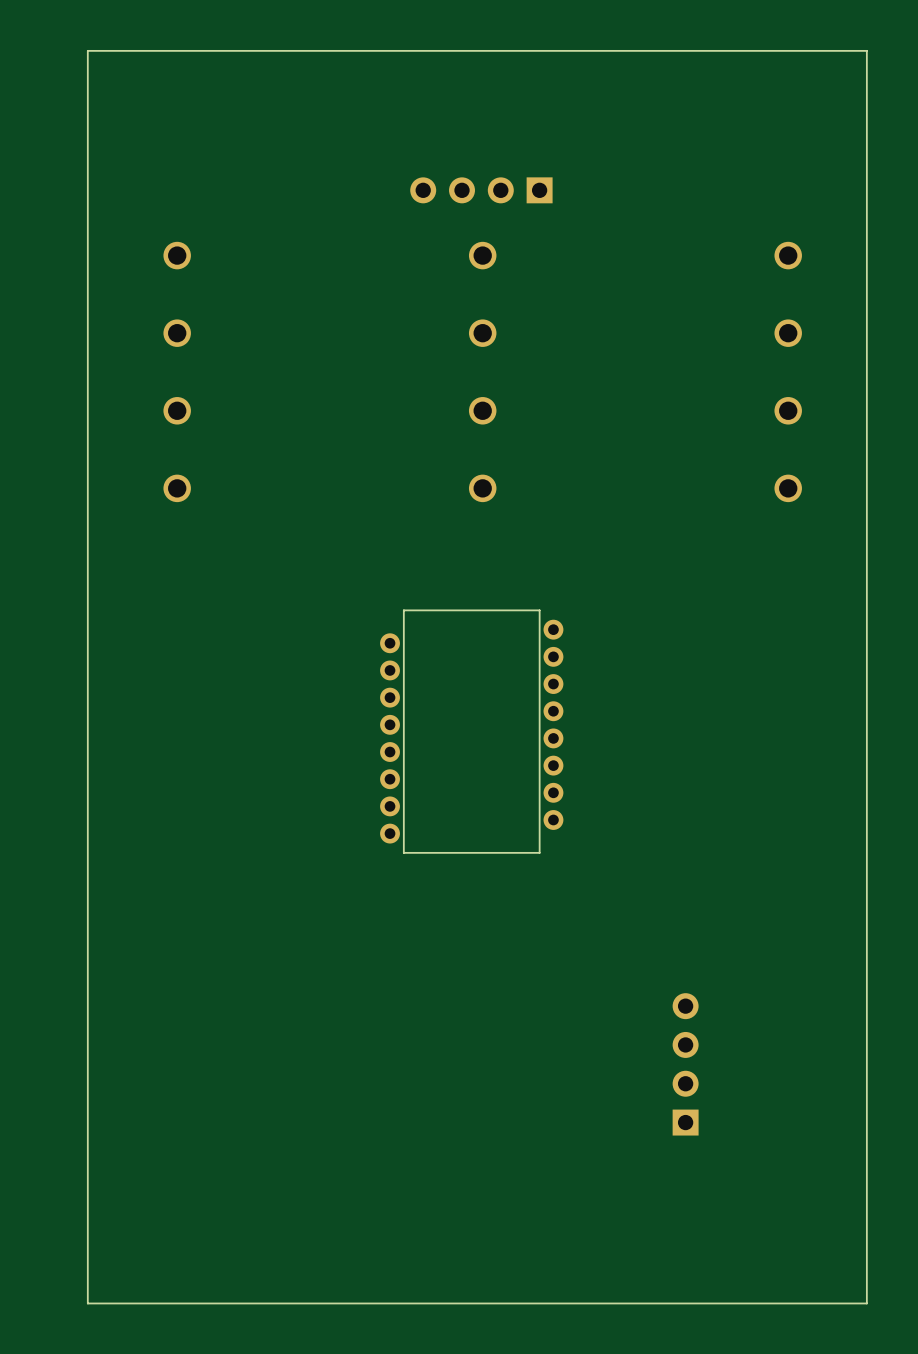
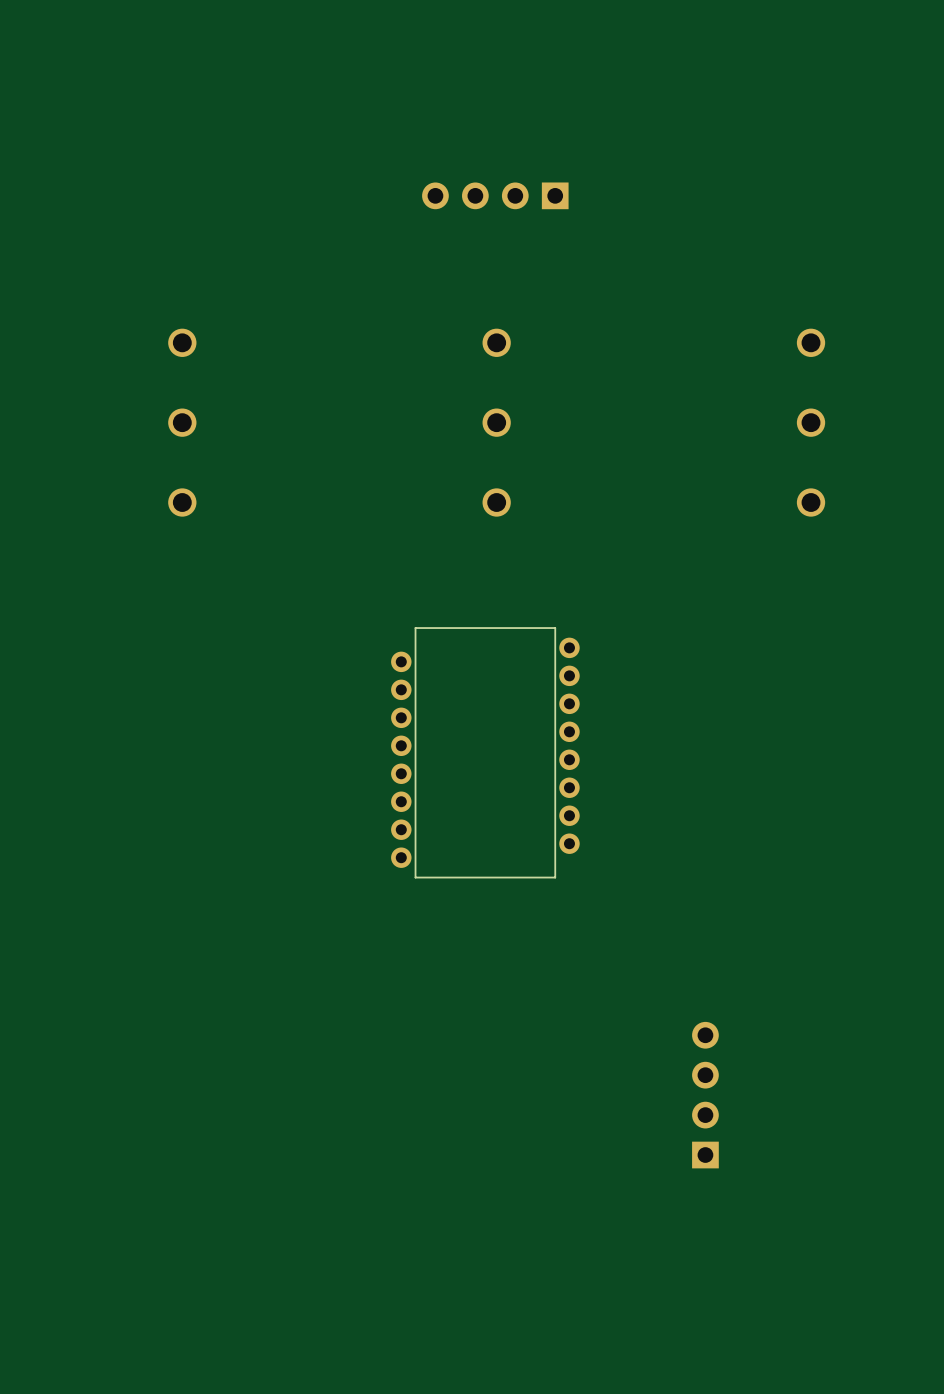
board edge: (866, 50) (87, 50) (87, 1303) (866, 1303) (866, 50) -> none
part: (177, 255) -> none
part: (482, 255) -> none
part: (788, 255) -> none

